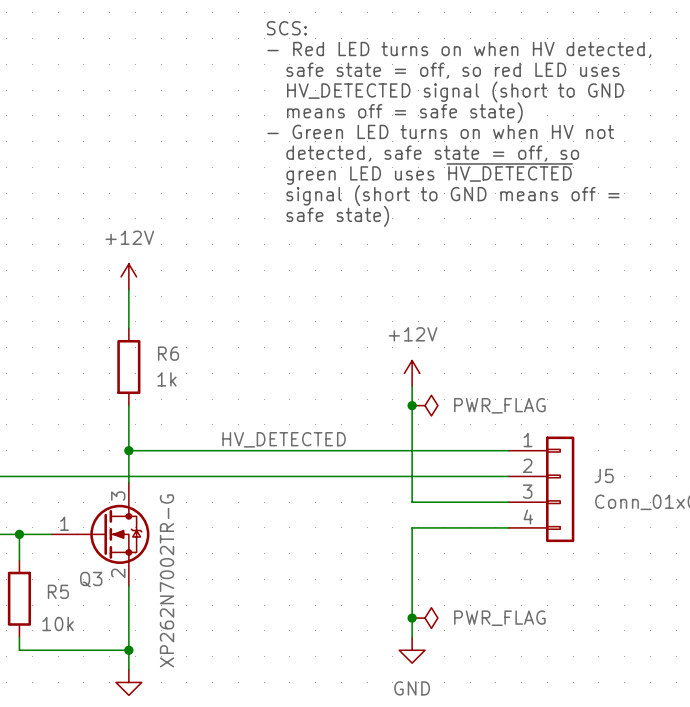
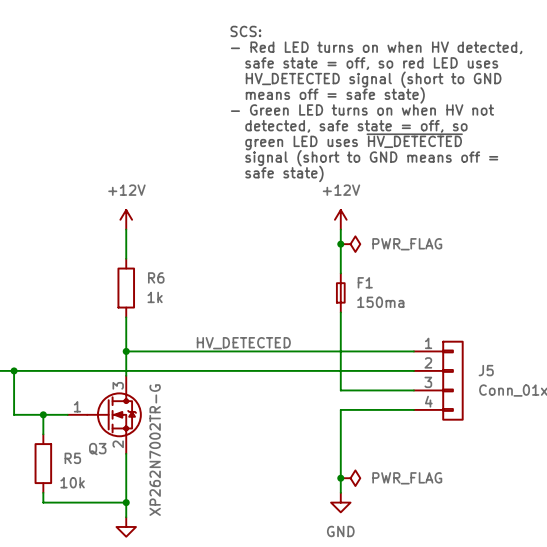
wire: none -> (340, 229) (340, 273)
junction: none -> (340, 244)
power symbol position: +12V (412, 373) -> +12V (340, 219)
F1: none -> 150ma (340, 292)
junction: (412, 405) -> none
power symbol position: PWR_FLAG (424, 405) -> PWR_FLAG (350, 244)

